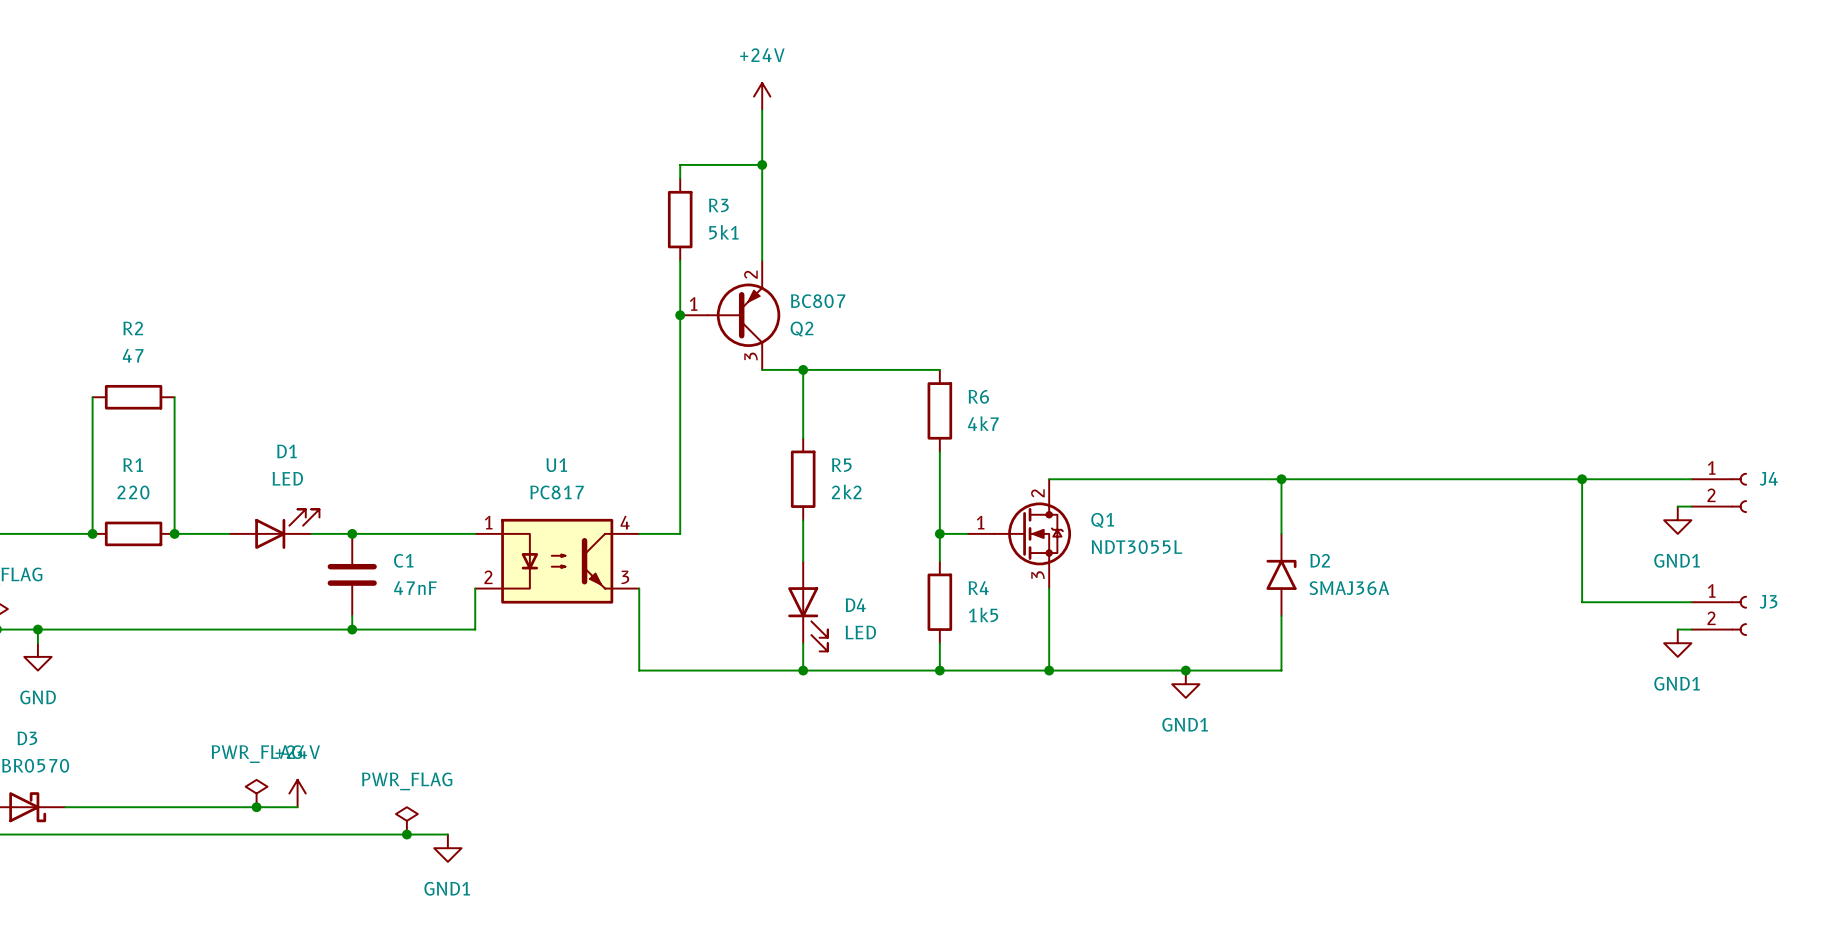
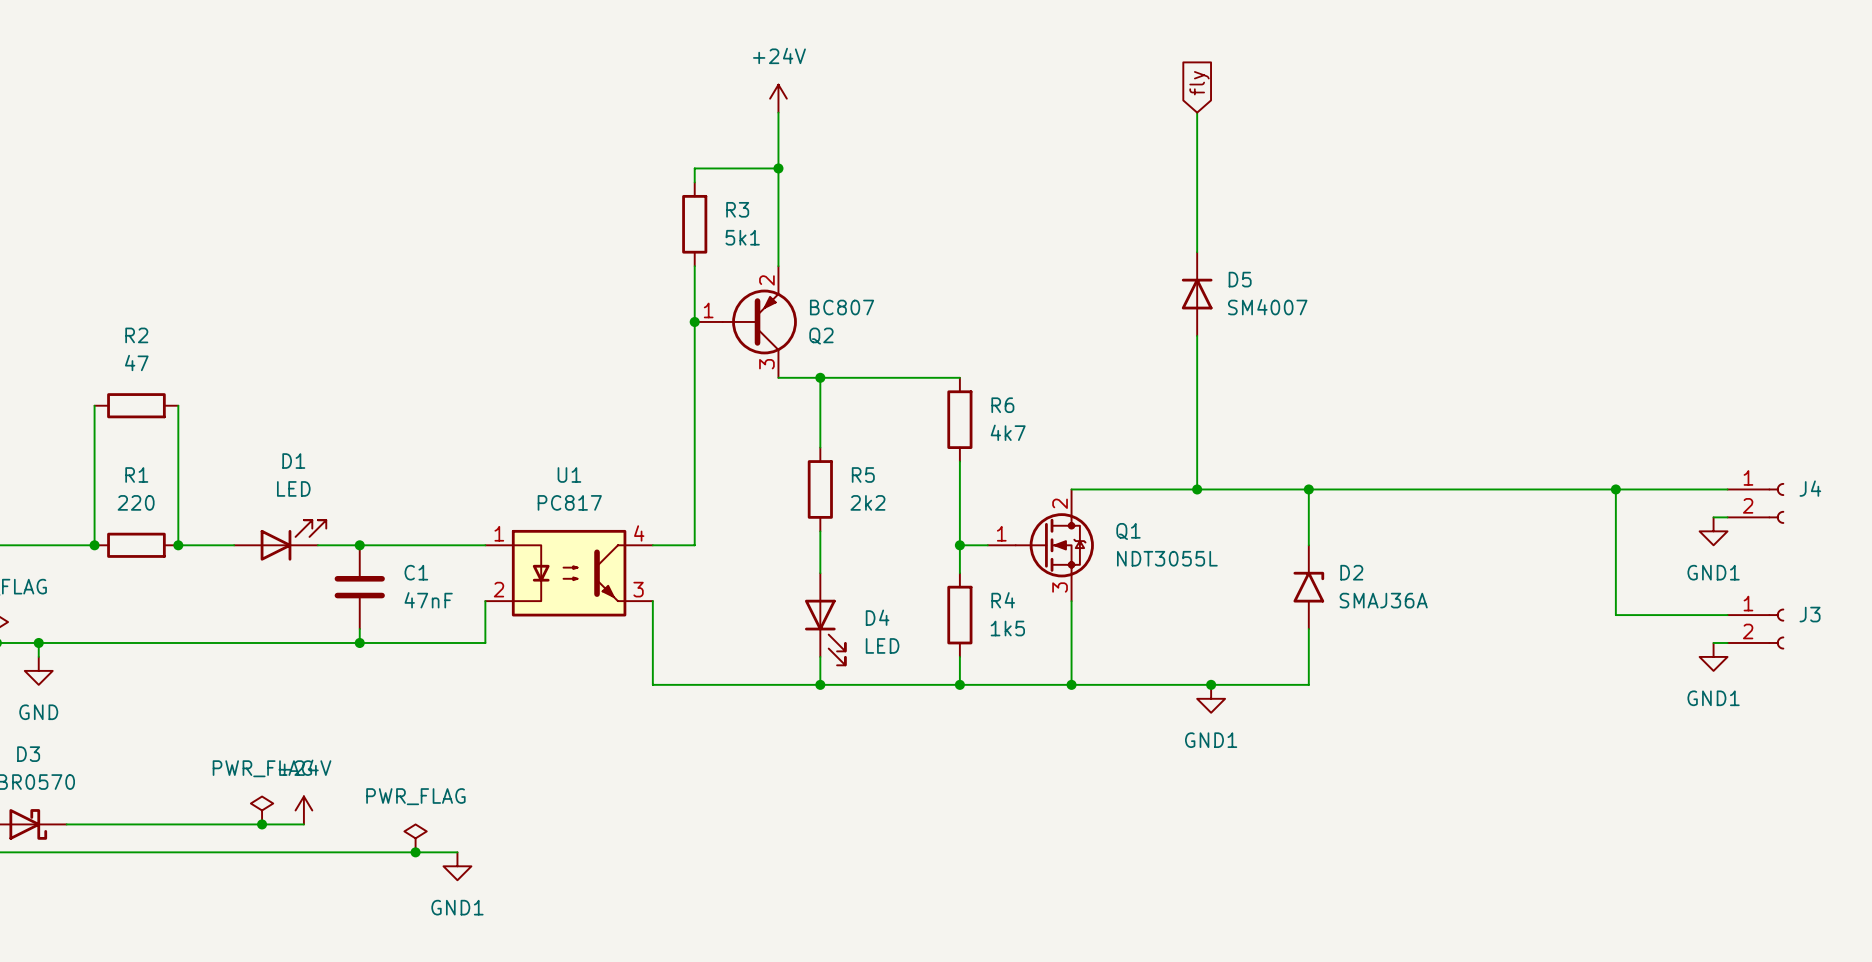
global label: none -> fly (1199, 83)
wire: none -> (1197, 112) (1197, 252)
D5: none -> SM4007 (1197, 294)
wire: none -> (1197, 335) (1197, 489)
junction: none -> (1197, 489)

